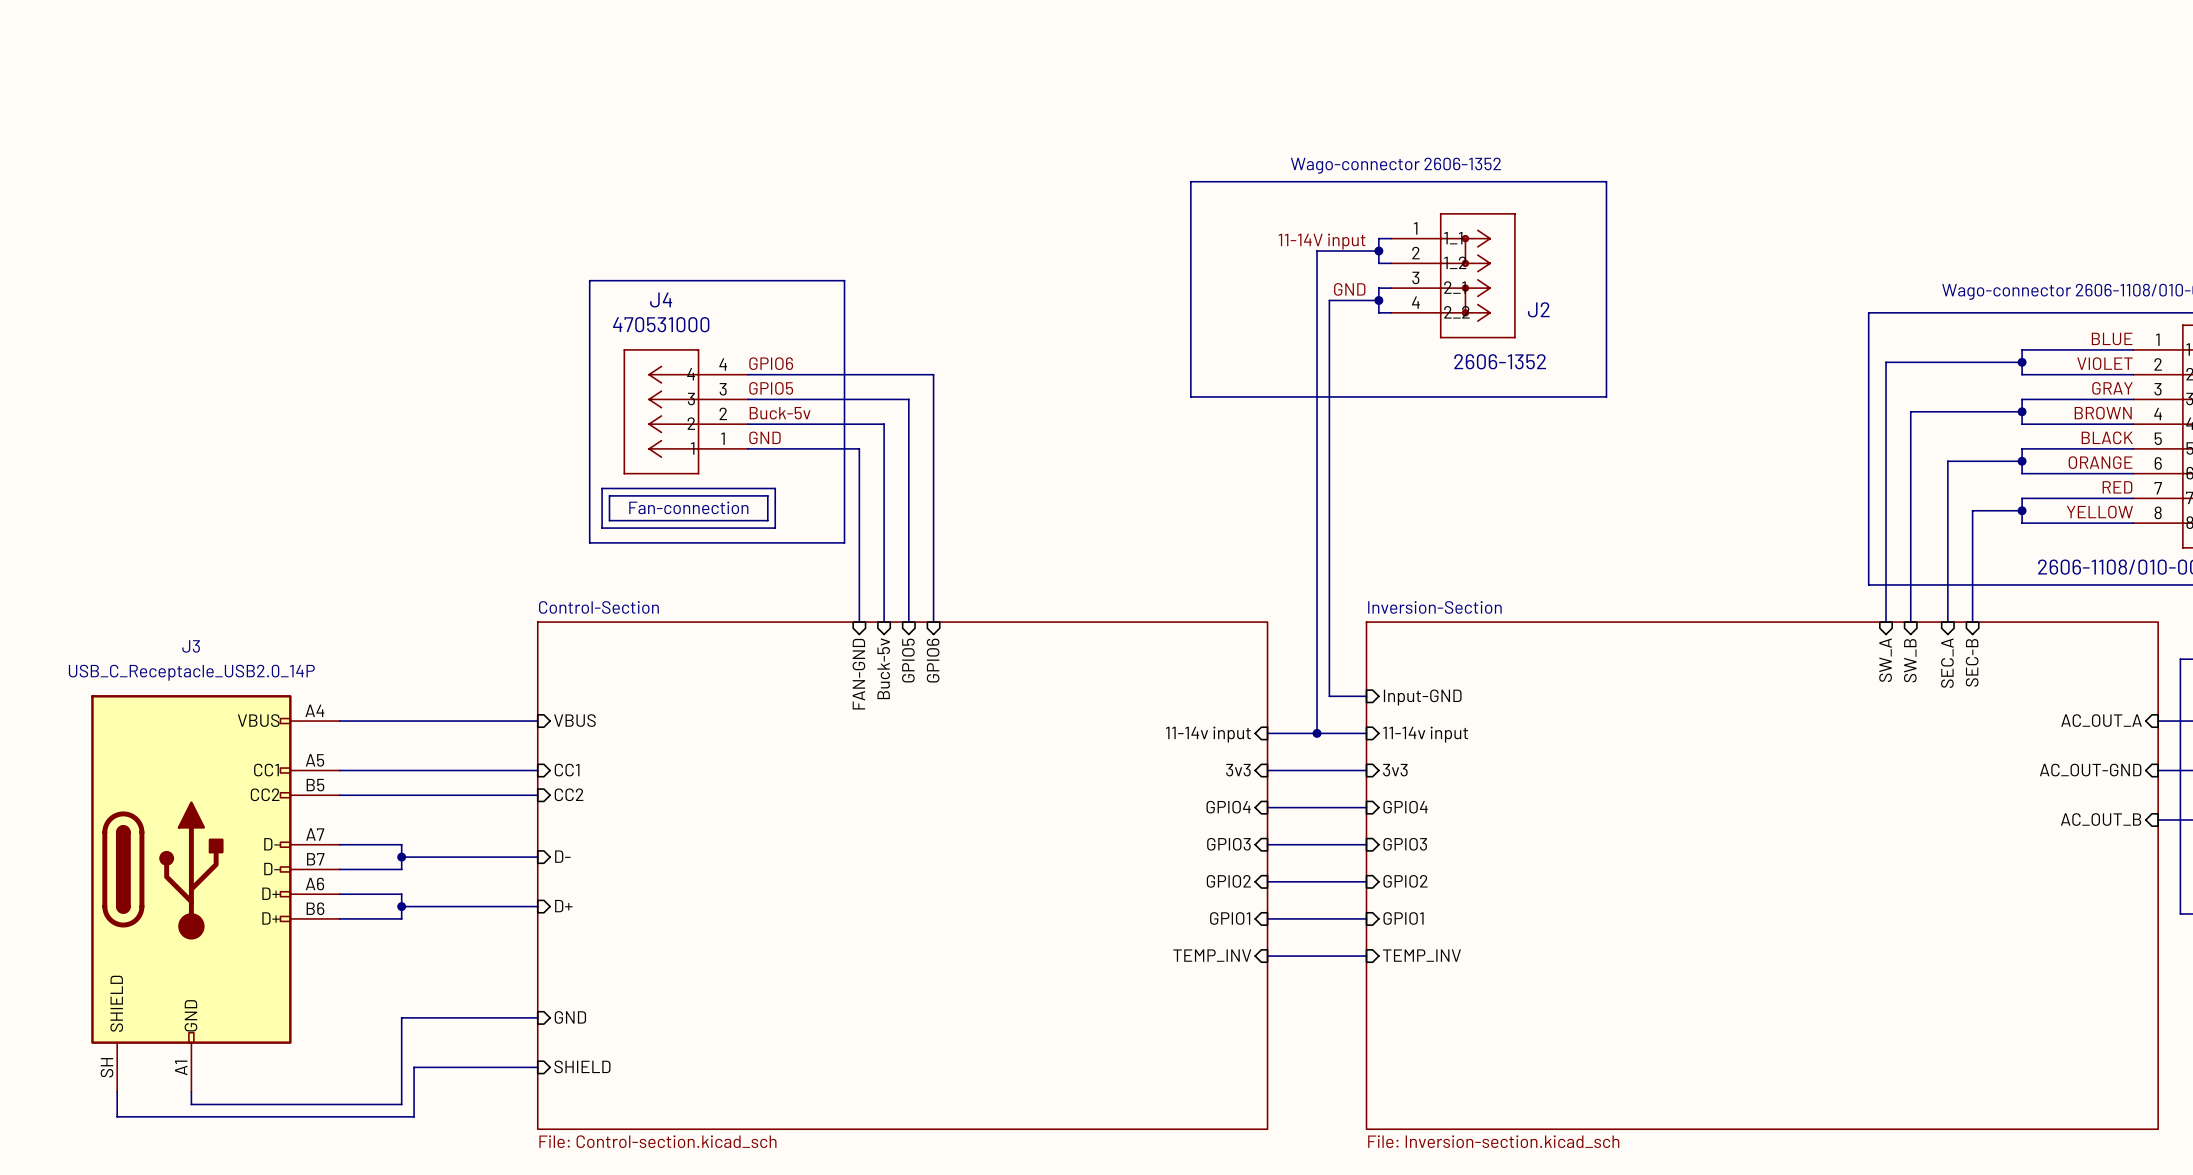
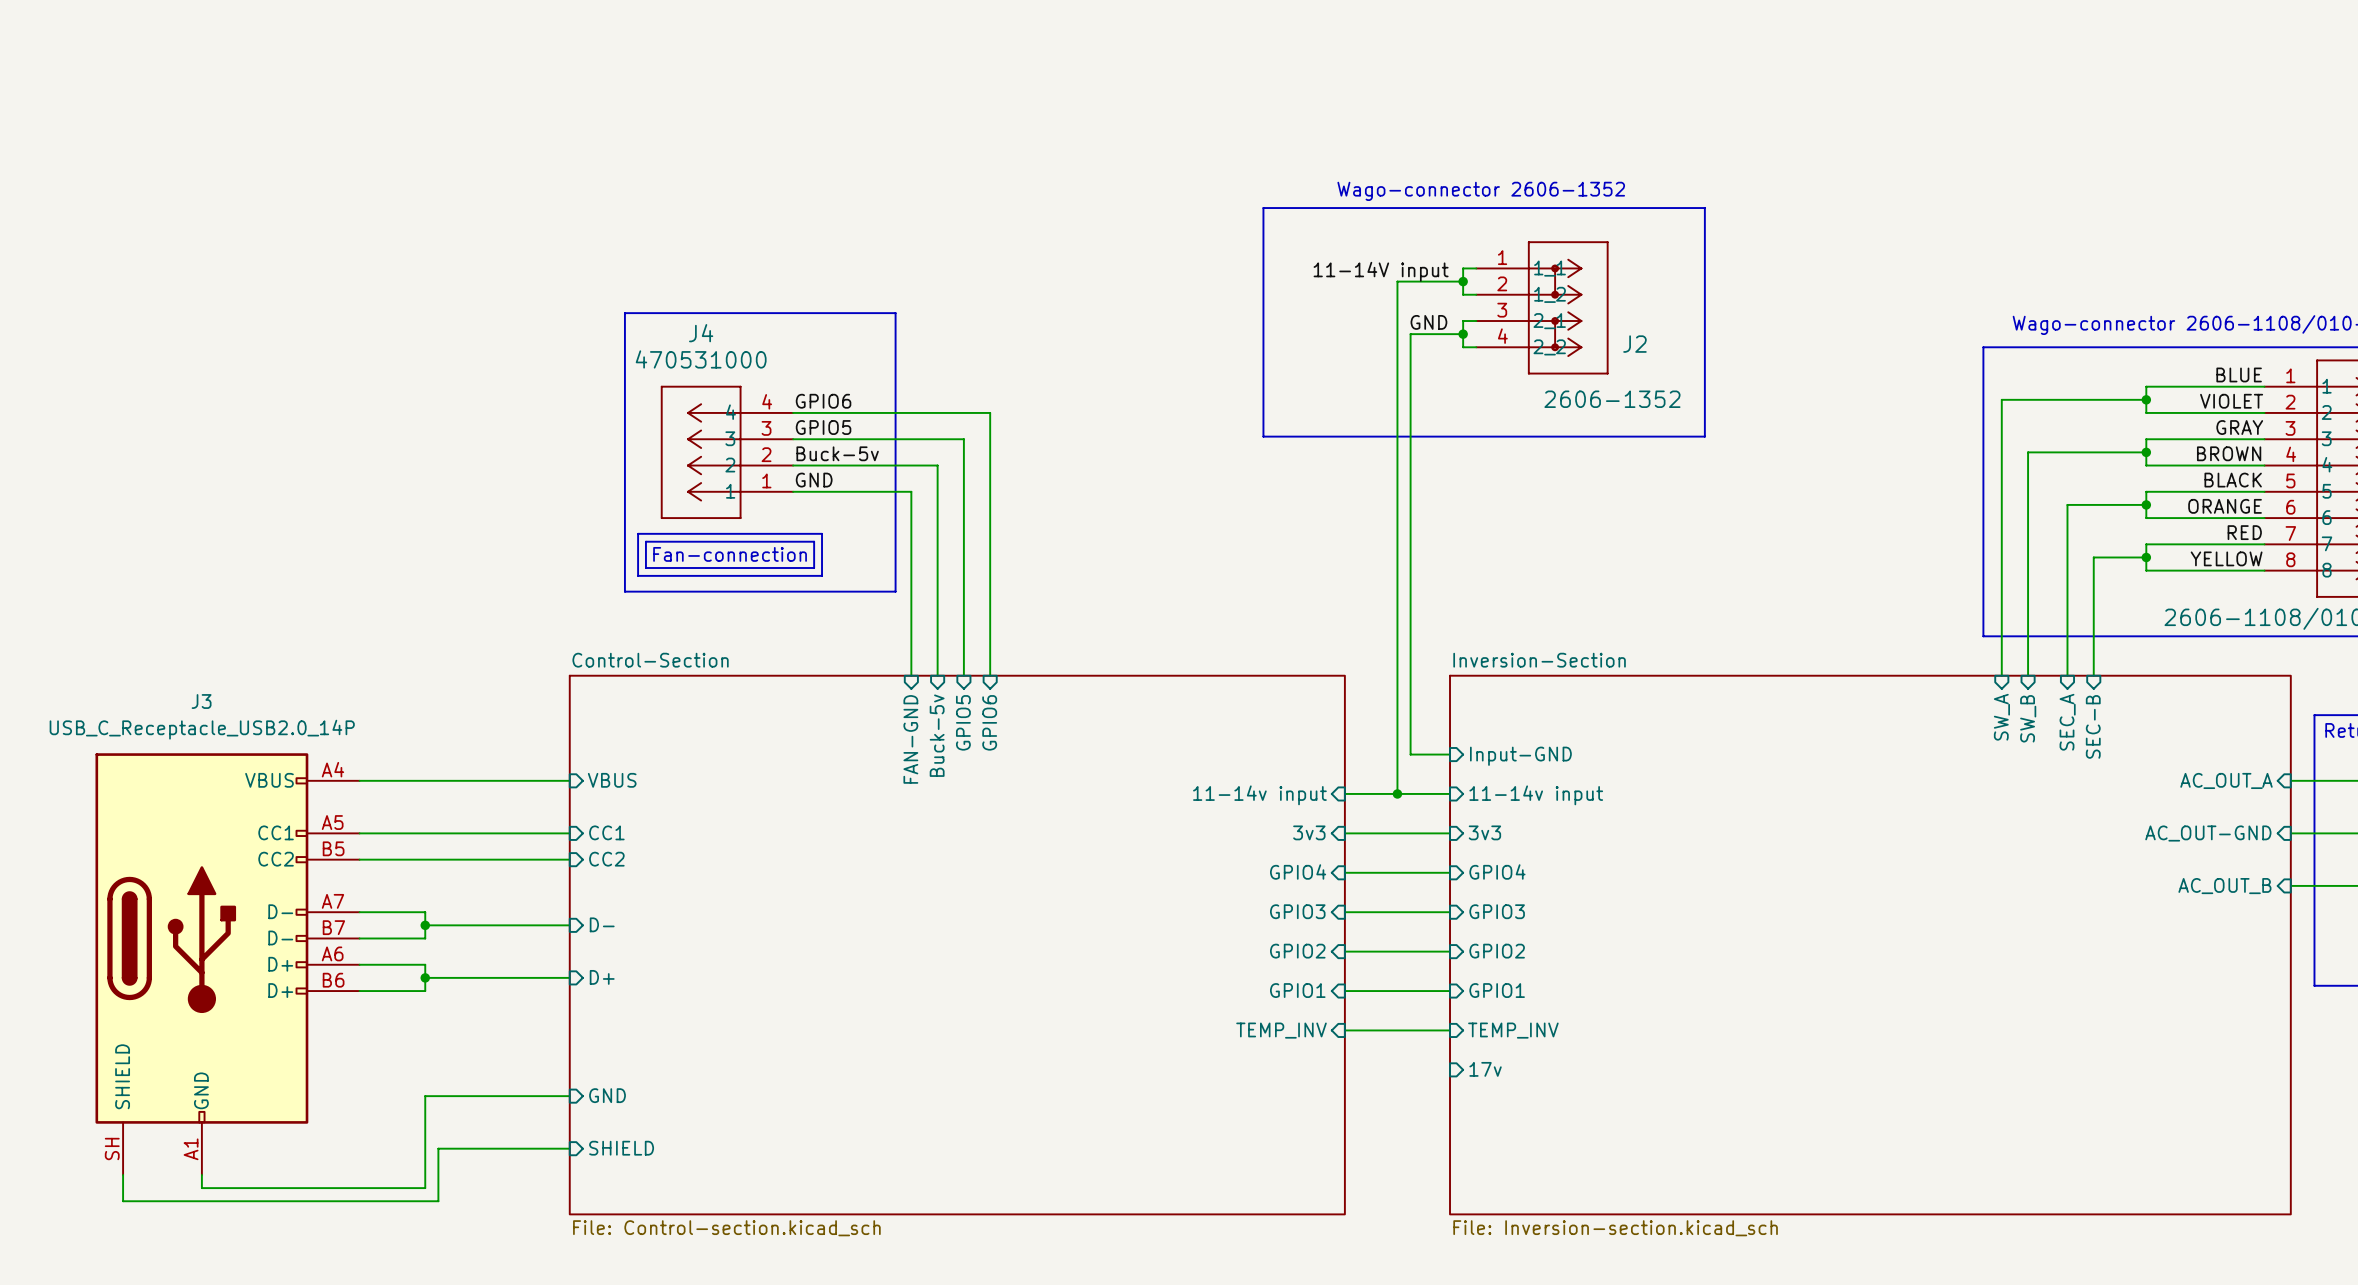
sheet pin: none -> 17v (1485, 1069)

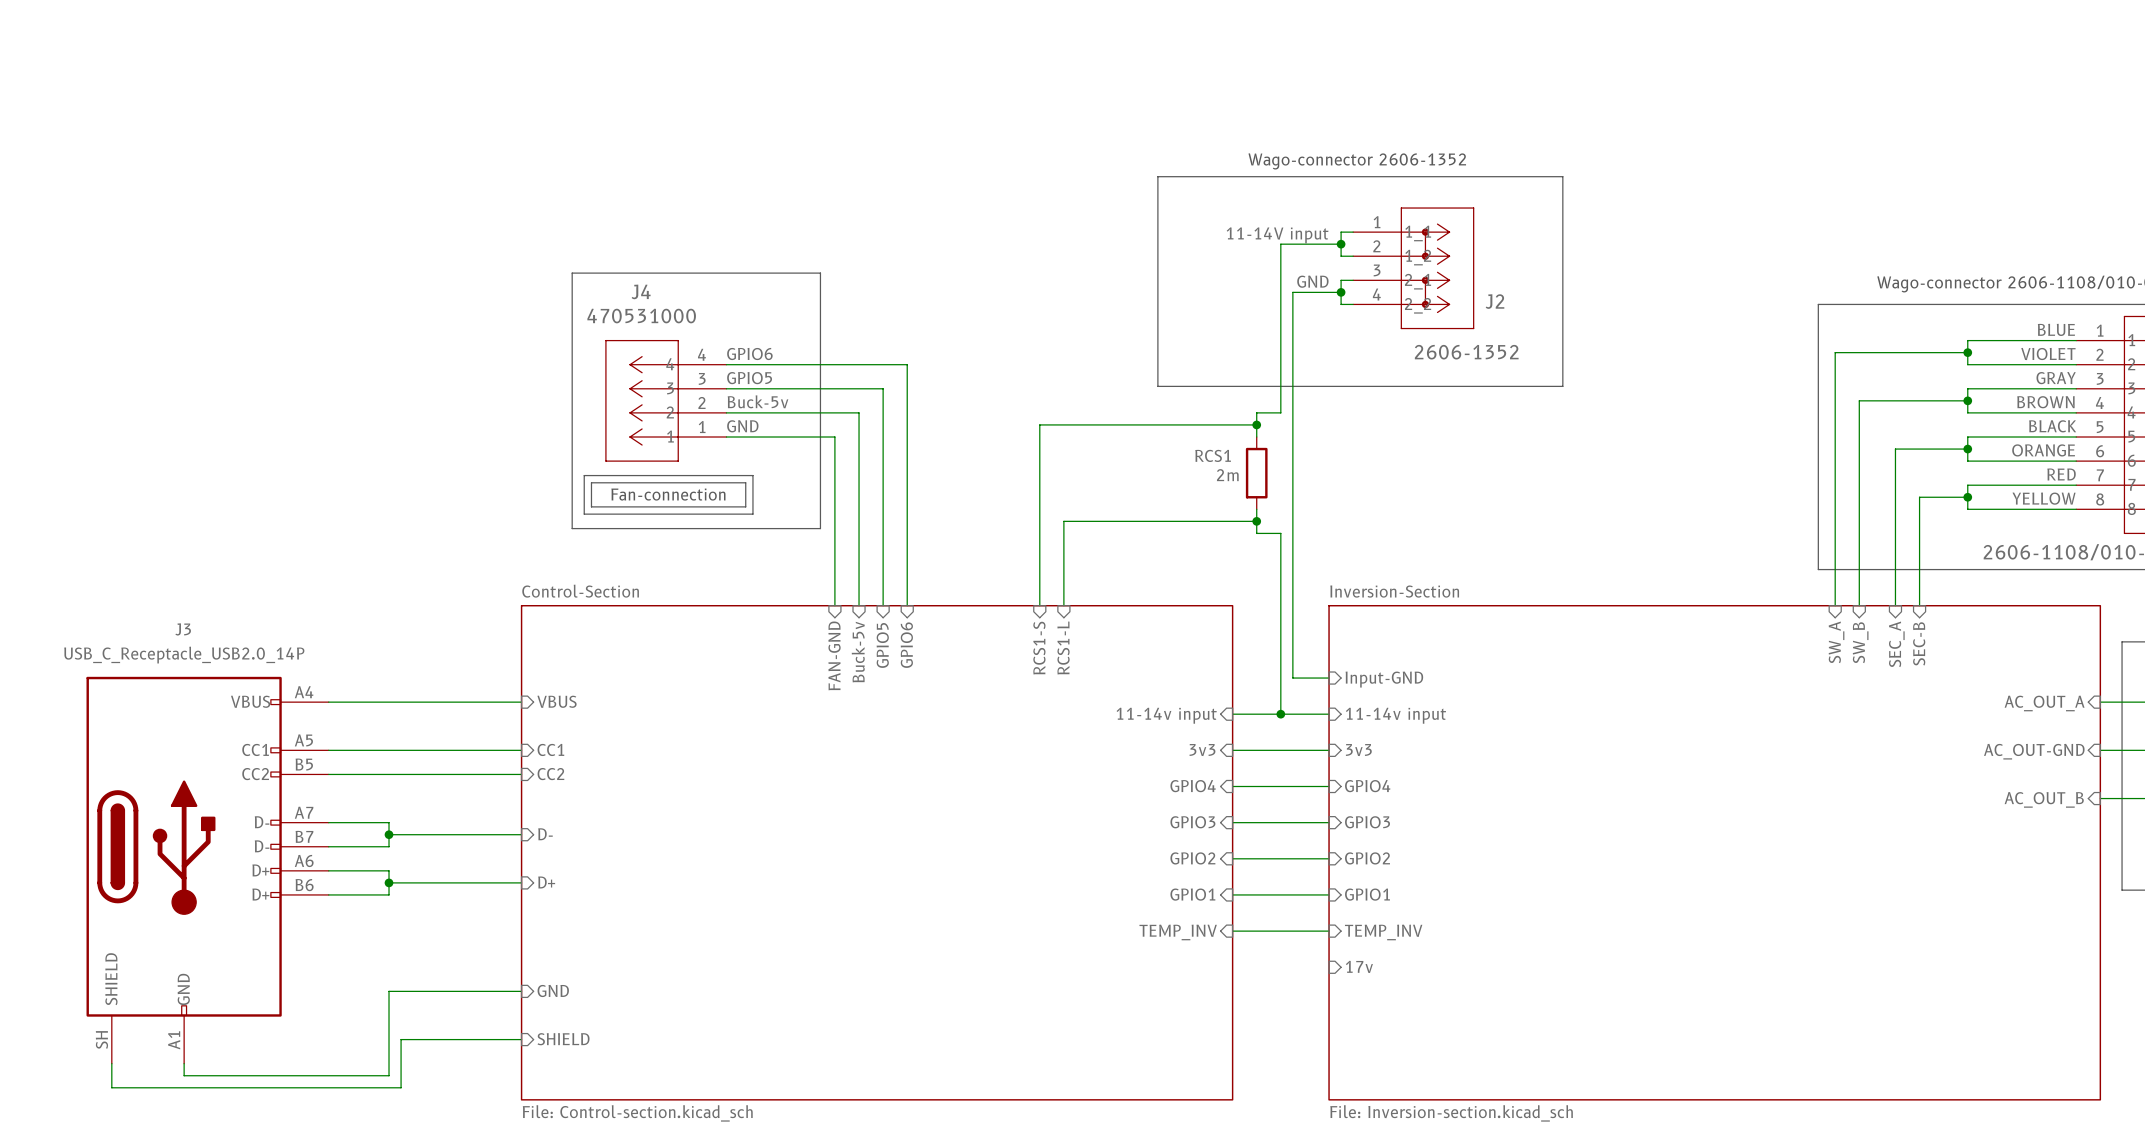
wire: (1397, 465) (1397, 596) -> (1256, 509) (1256, 533) (1280, 533)
wire: none -> (1280, 412) (1256, 412) (1256, 437)
wire: none -> (1256, 424) (1039, 424) (1039, 605)
junction: none -> (1256, 424)
RCS1: none -> 2m (1256, 473)
wire: none -> (1256, 521) (1063, 521) (1063, 605)
junction: none -> (1256, 521)
sheet pin: none -> RCS1-L (1063, 648)
sheet pin: none -> RCS1-S (1039, 648)

